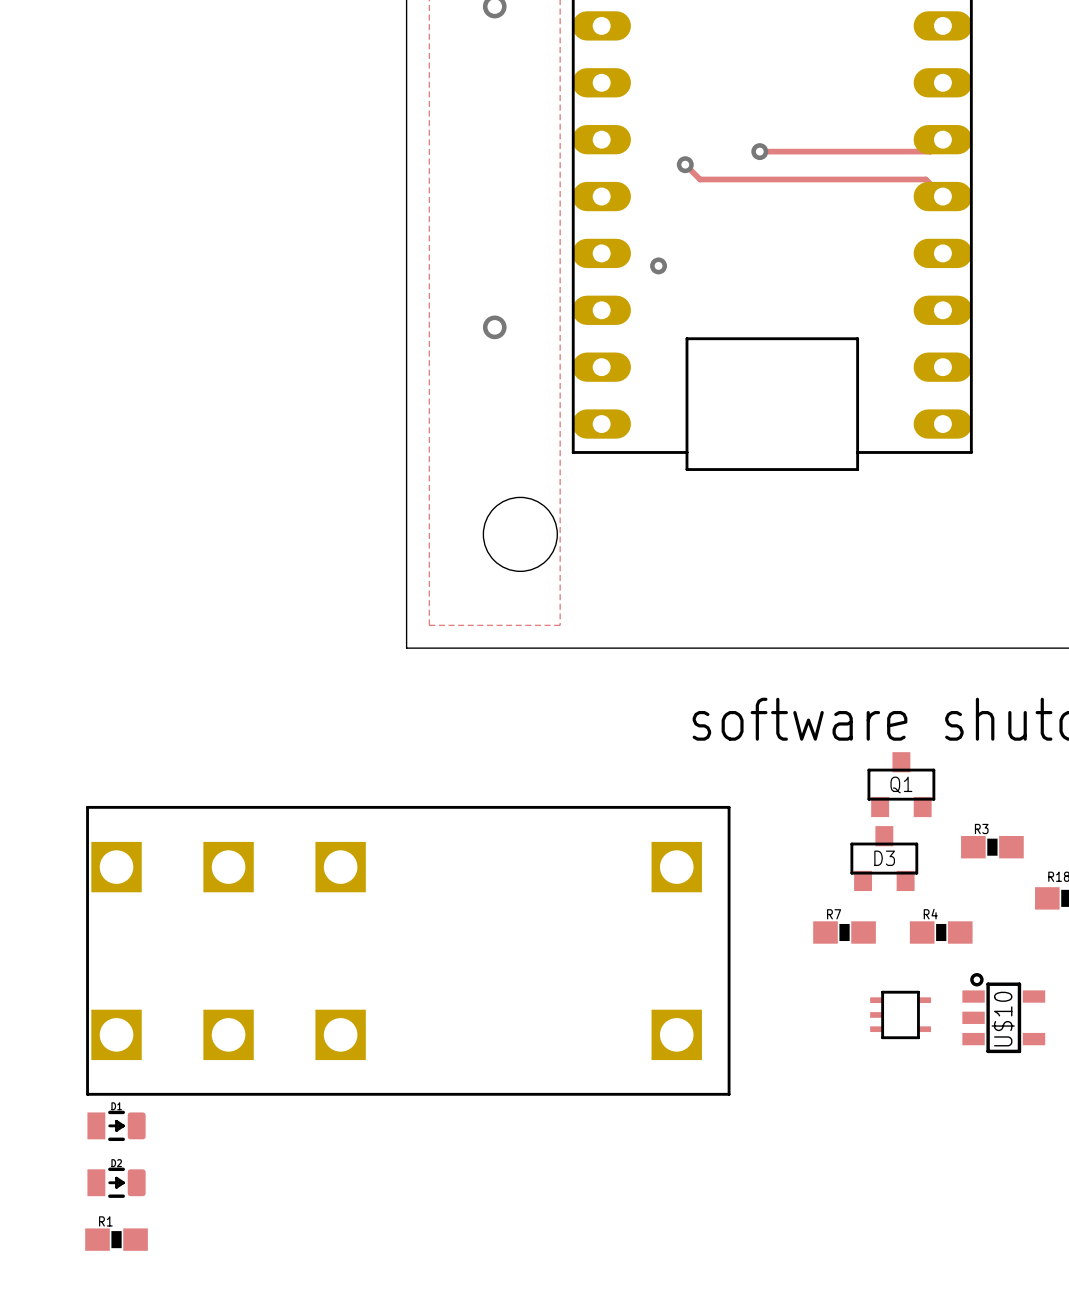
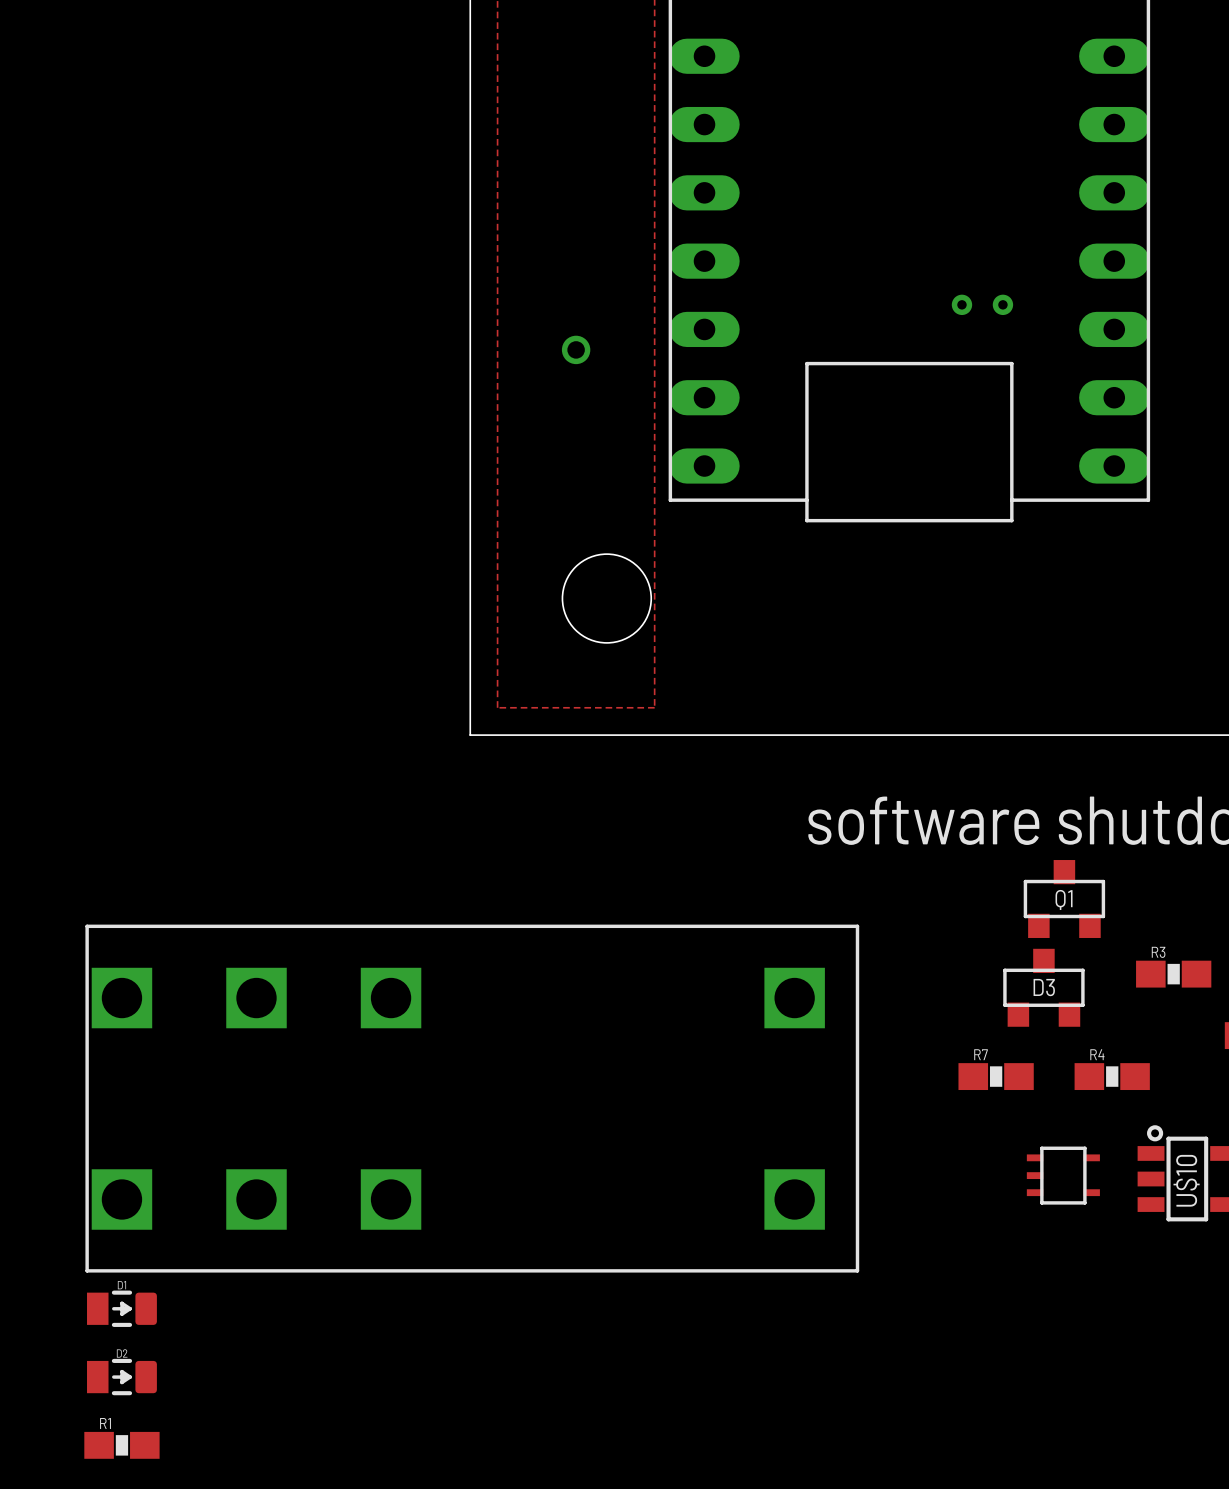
track: (942, 139) (930, 151) (759, 151) -> none
via: (759, 151) -> none
track: (685, 164) (700, 179) (925, 179) (942, 196) -> none
via: (685, 164) -> none
via: (658, 265) -> none
via: none -> (961, 304)
via: none -> (1002, 304)

